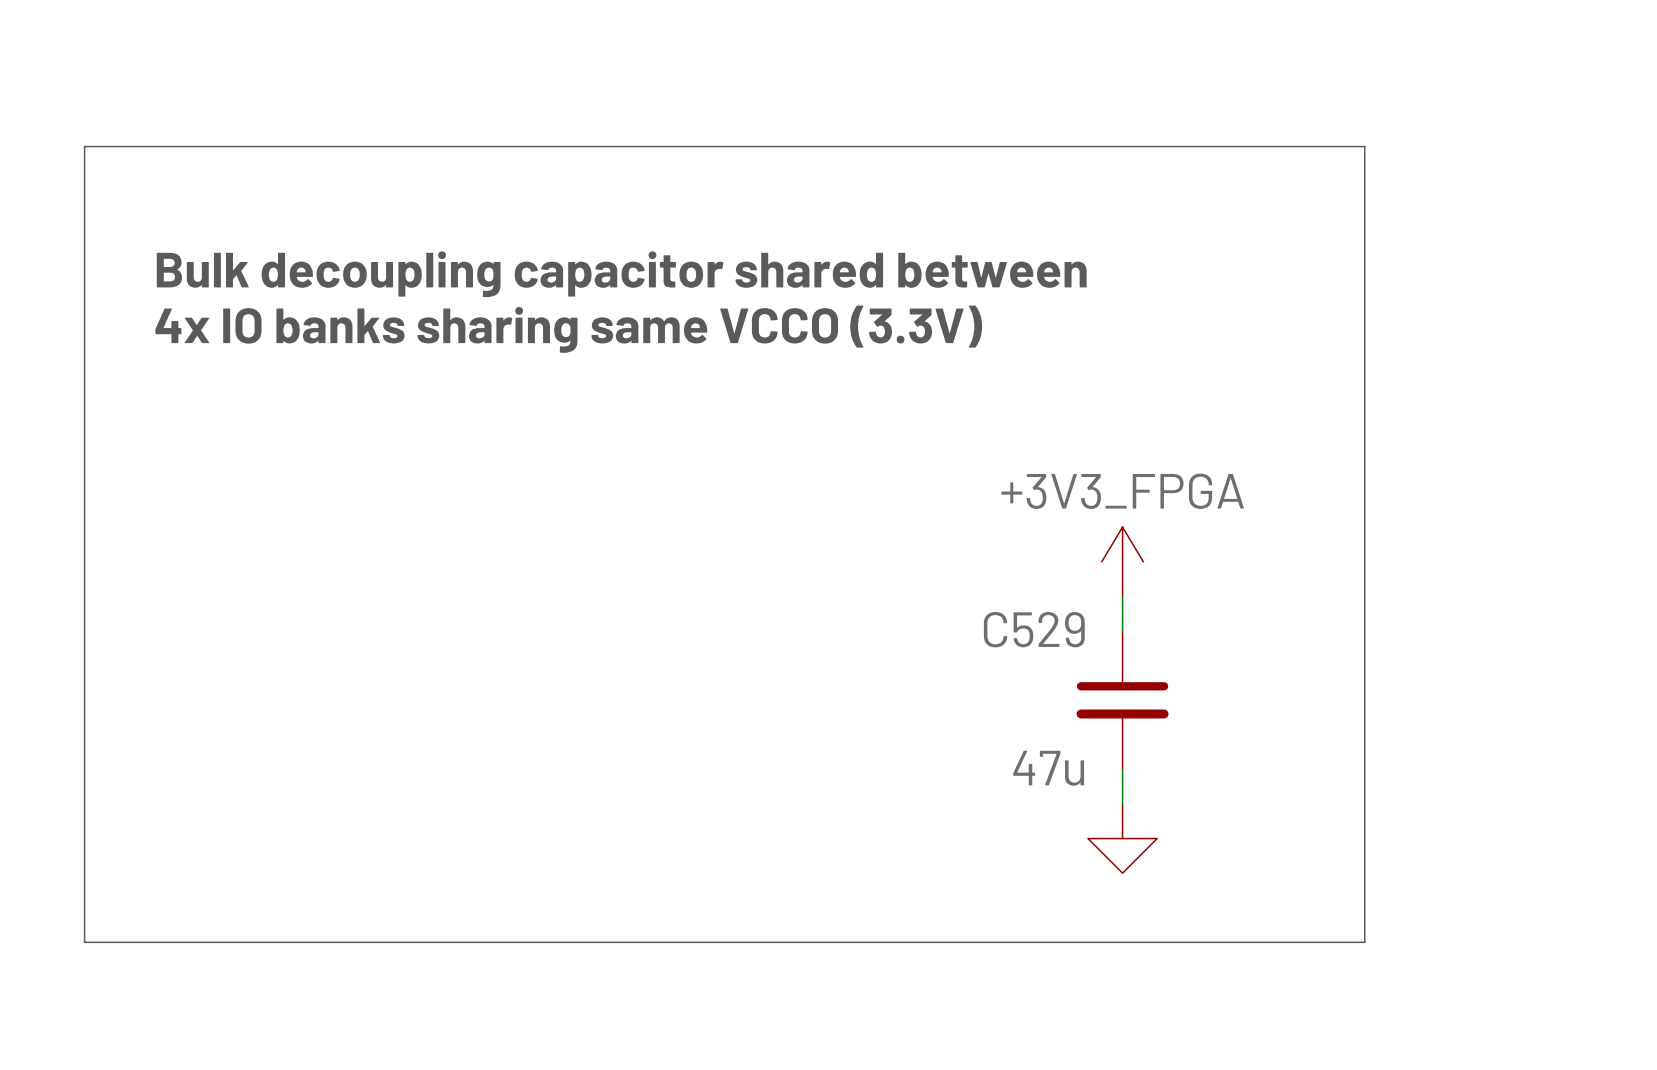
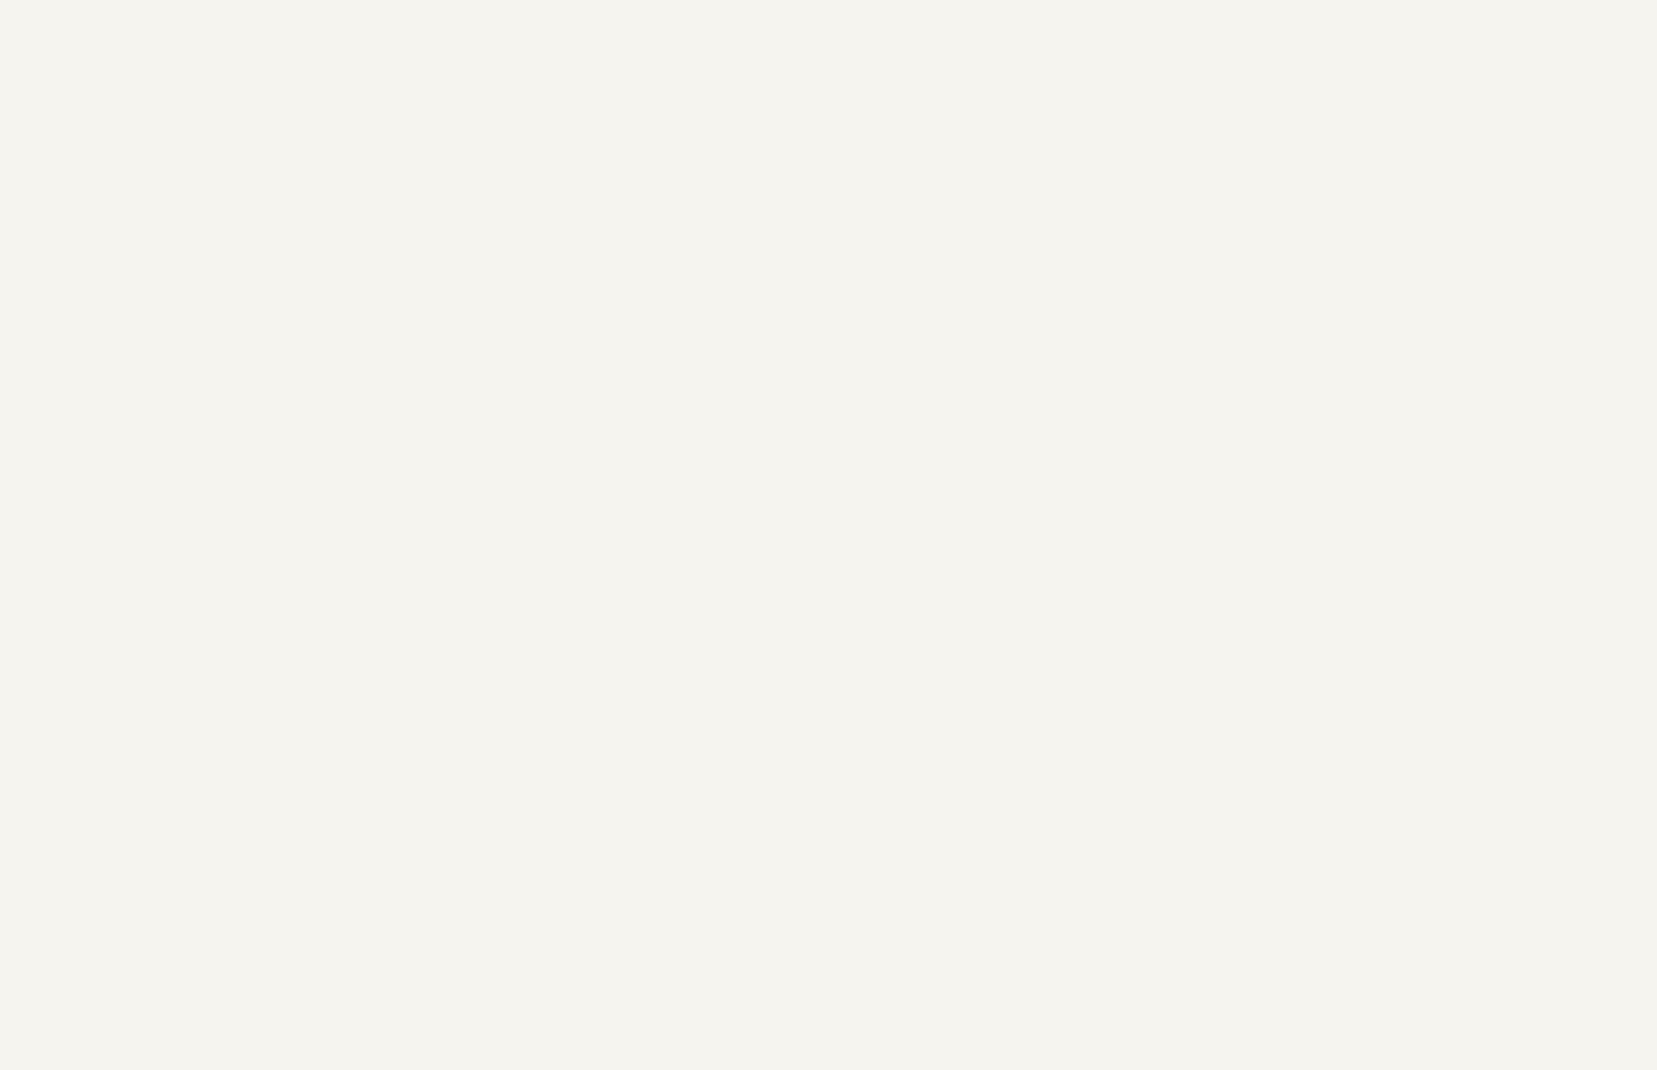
line: (84, 146) (1364, 146) (1364, 942) (84, 942) (84, 146) -> none
text: Bulk decoupling capacitor shared between (621, 274) -> none
text: 4x IO banks sharing same VCCO (3.3V) (568, 329) -> none
power symbol: +3V3_FPGA (1122, 561) -> none
wire: (1122, 596) (1122, 630) -> none
C529: 47u (1122, 700) -> none
wire: (1122, 769) (1122, 803) -> none
power symbol: (1122, 838) -> none

